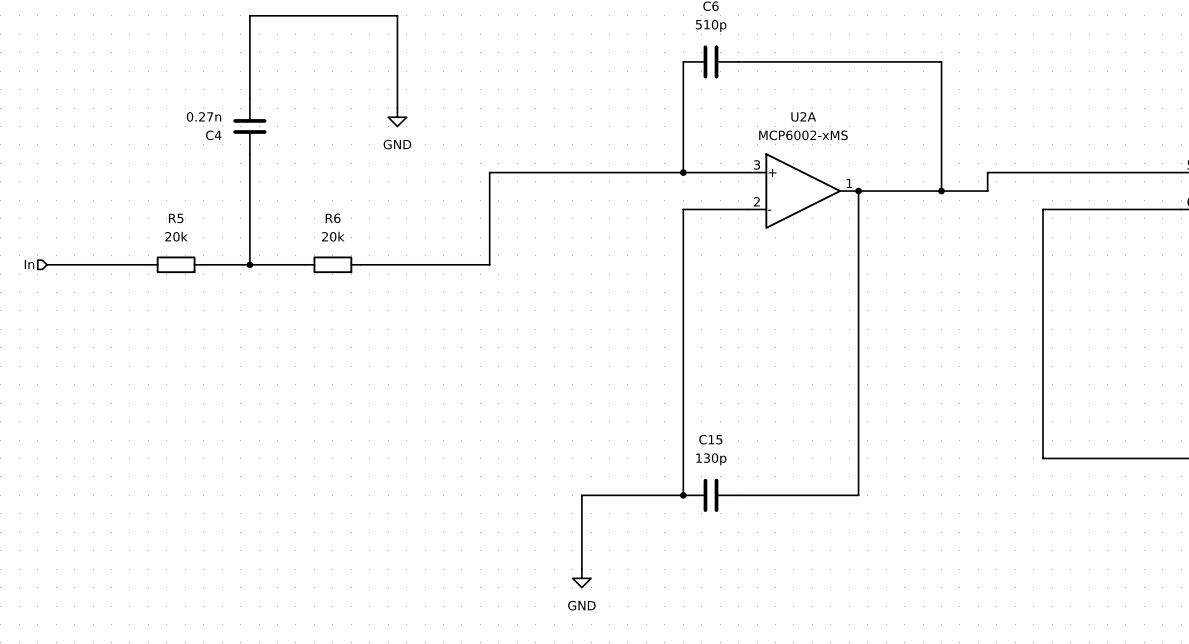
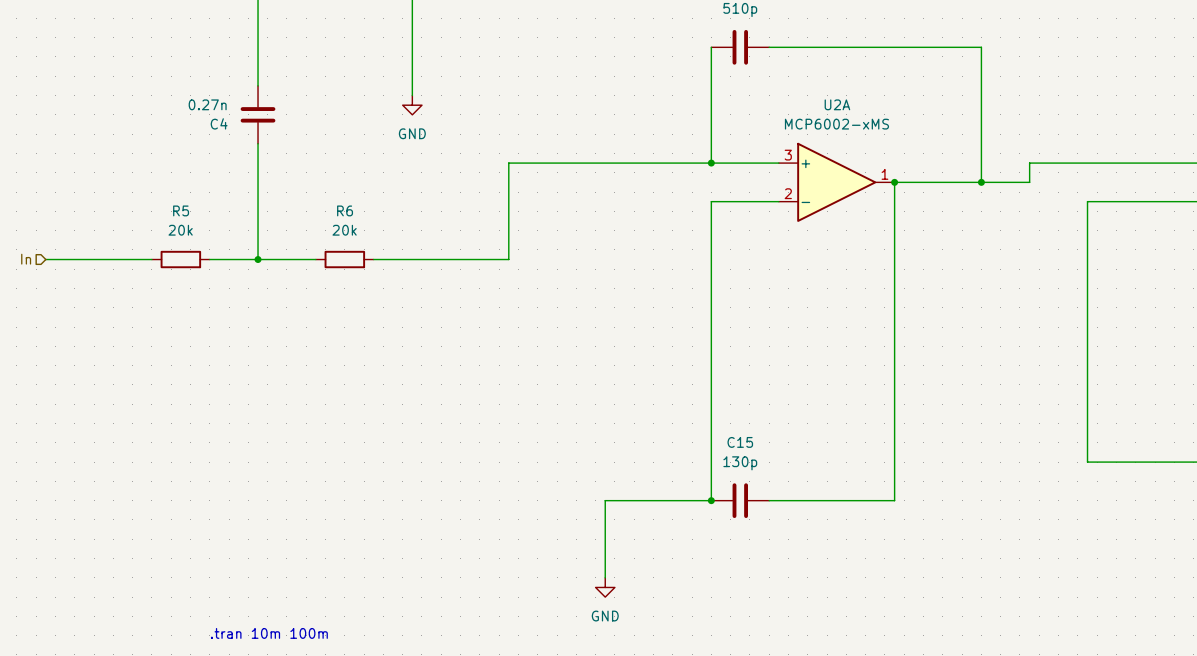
text: none -> .tran 10m 100m (269, 633)

